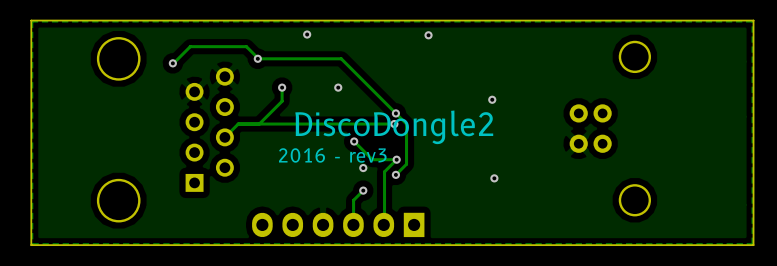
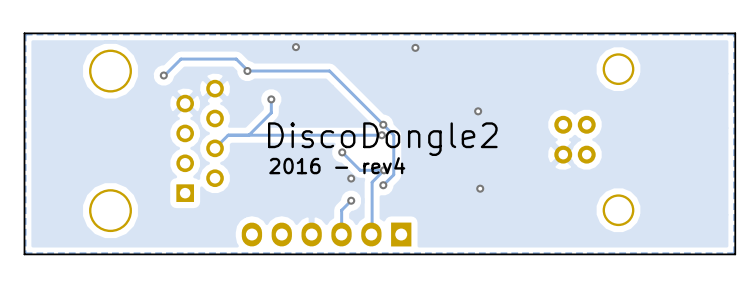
via: (338, 87) -> none
text: 2016 - rev3 (332, 155) -> 2016 - rev4 (337, 165)

